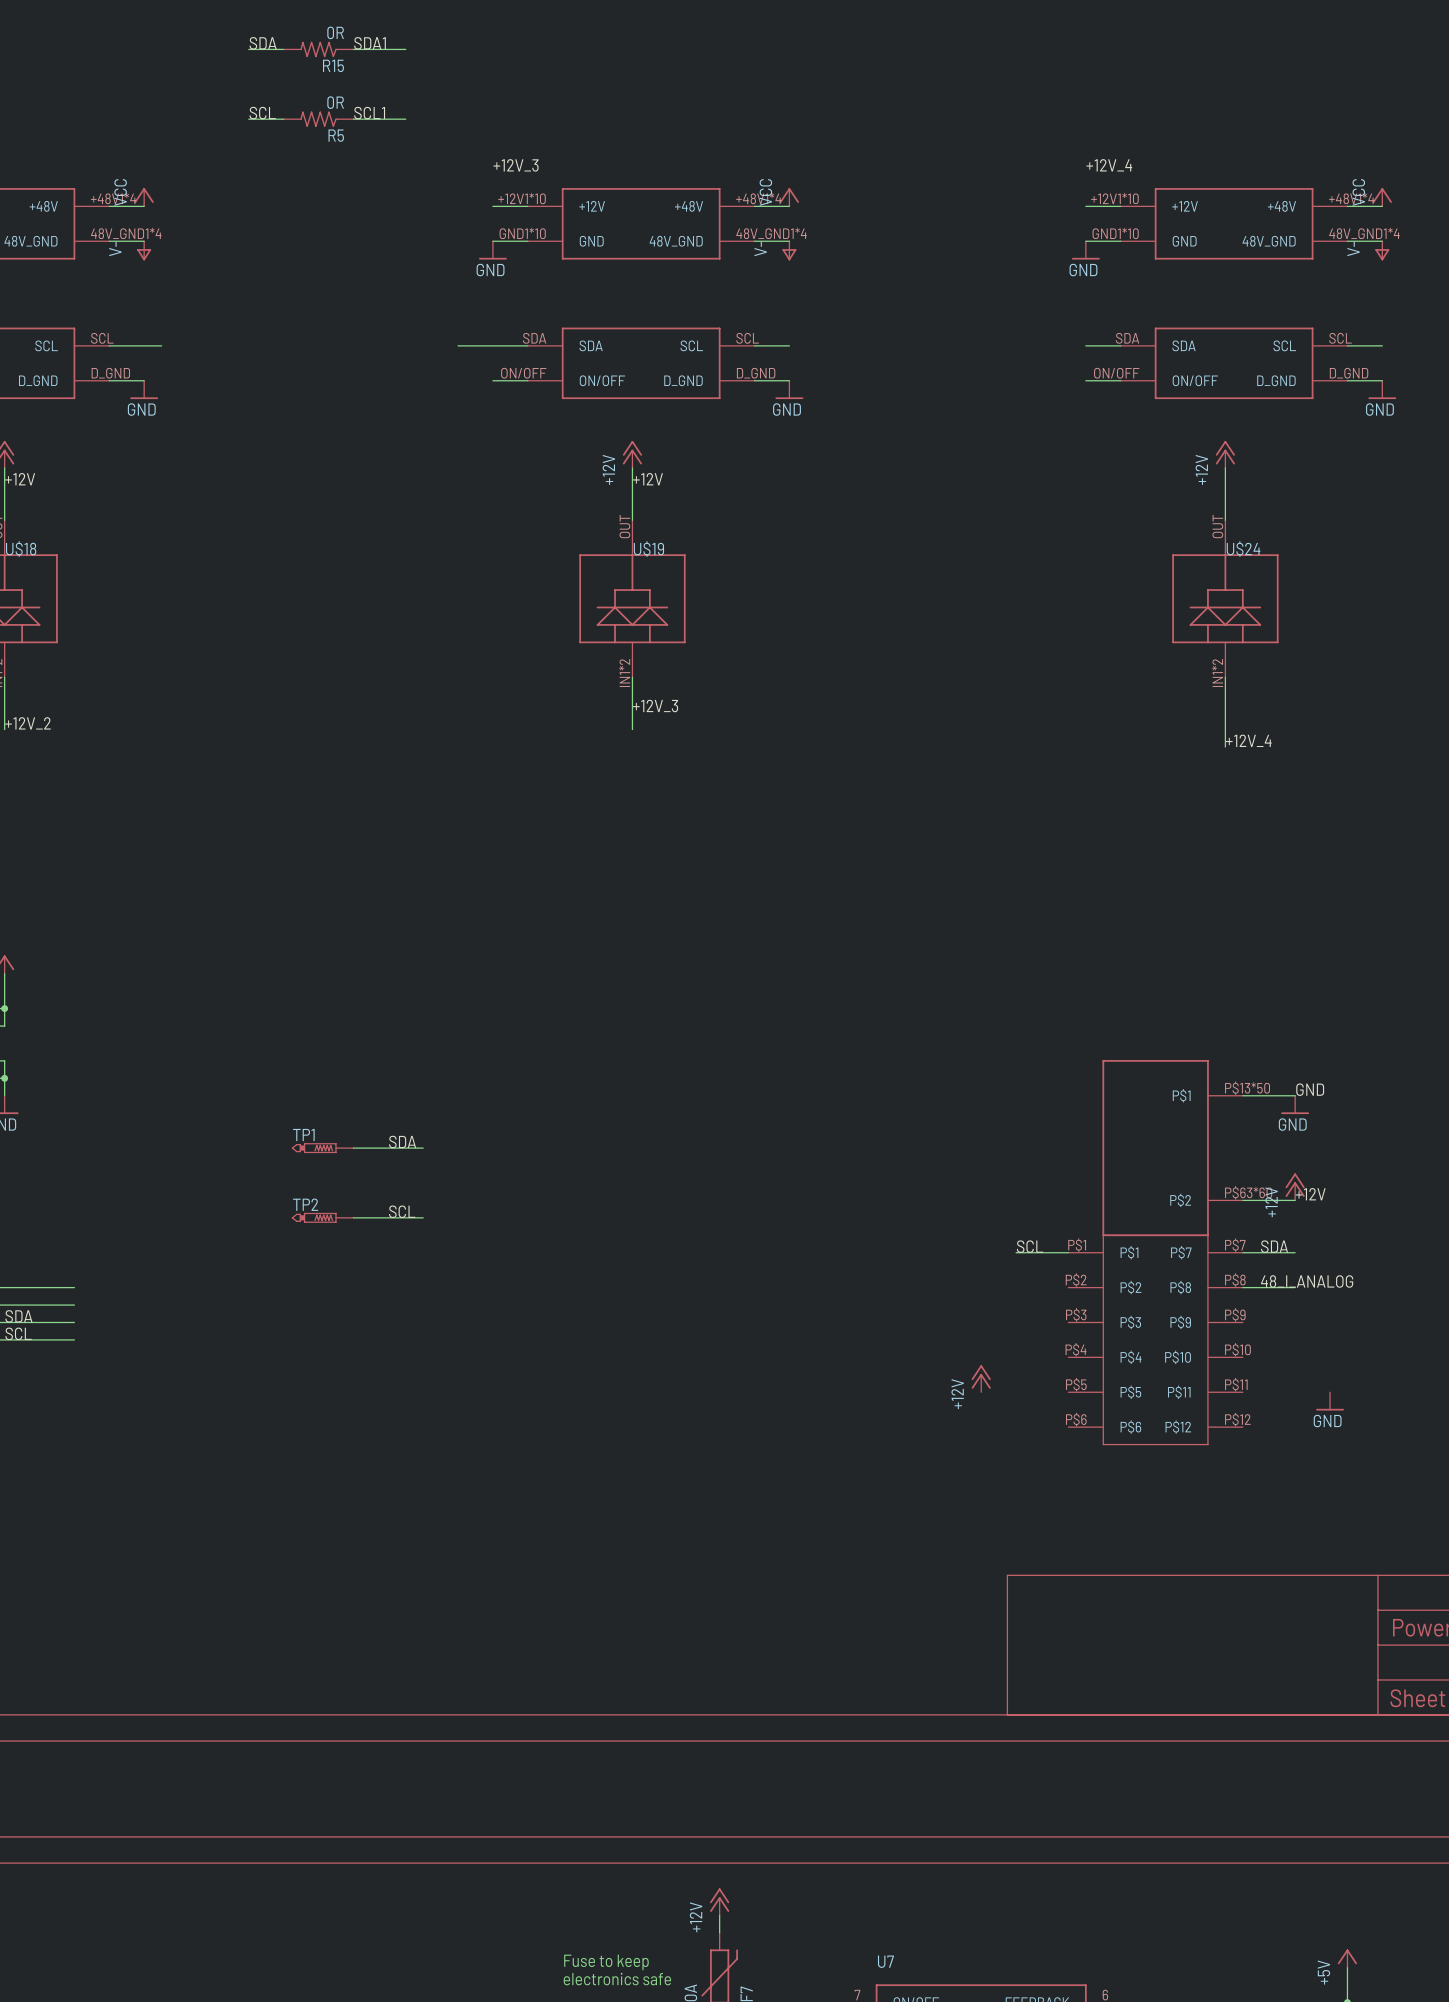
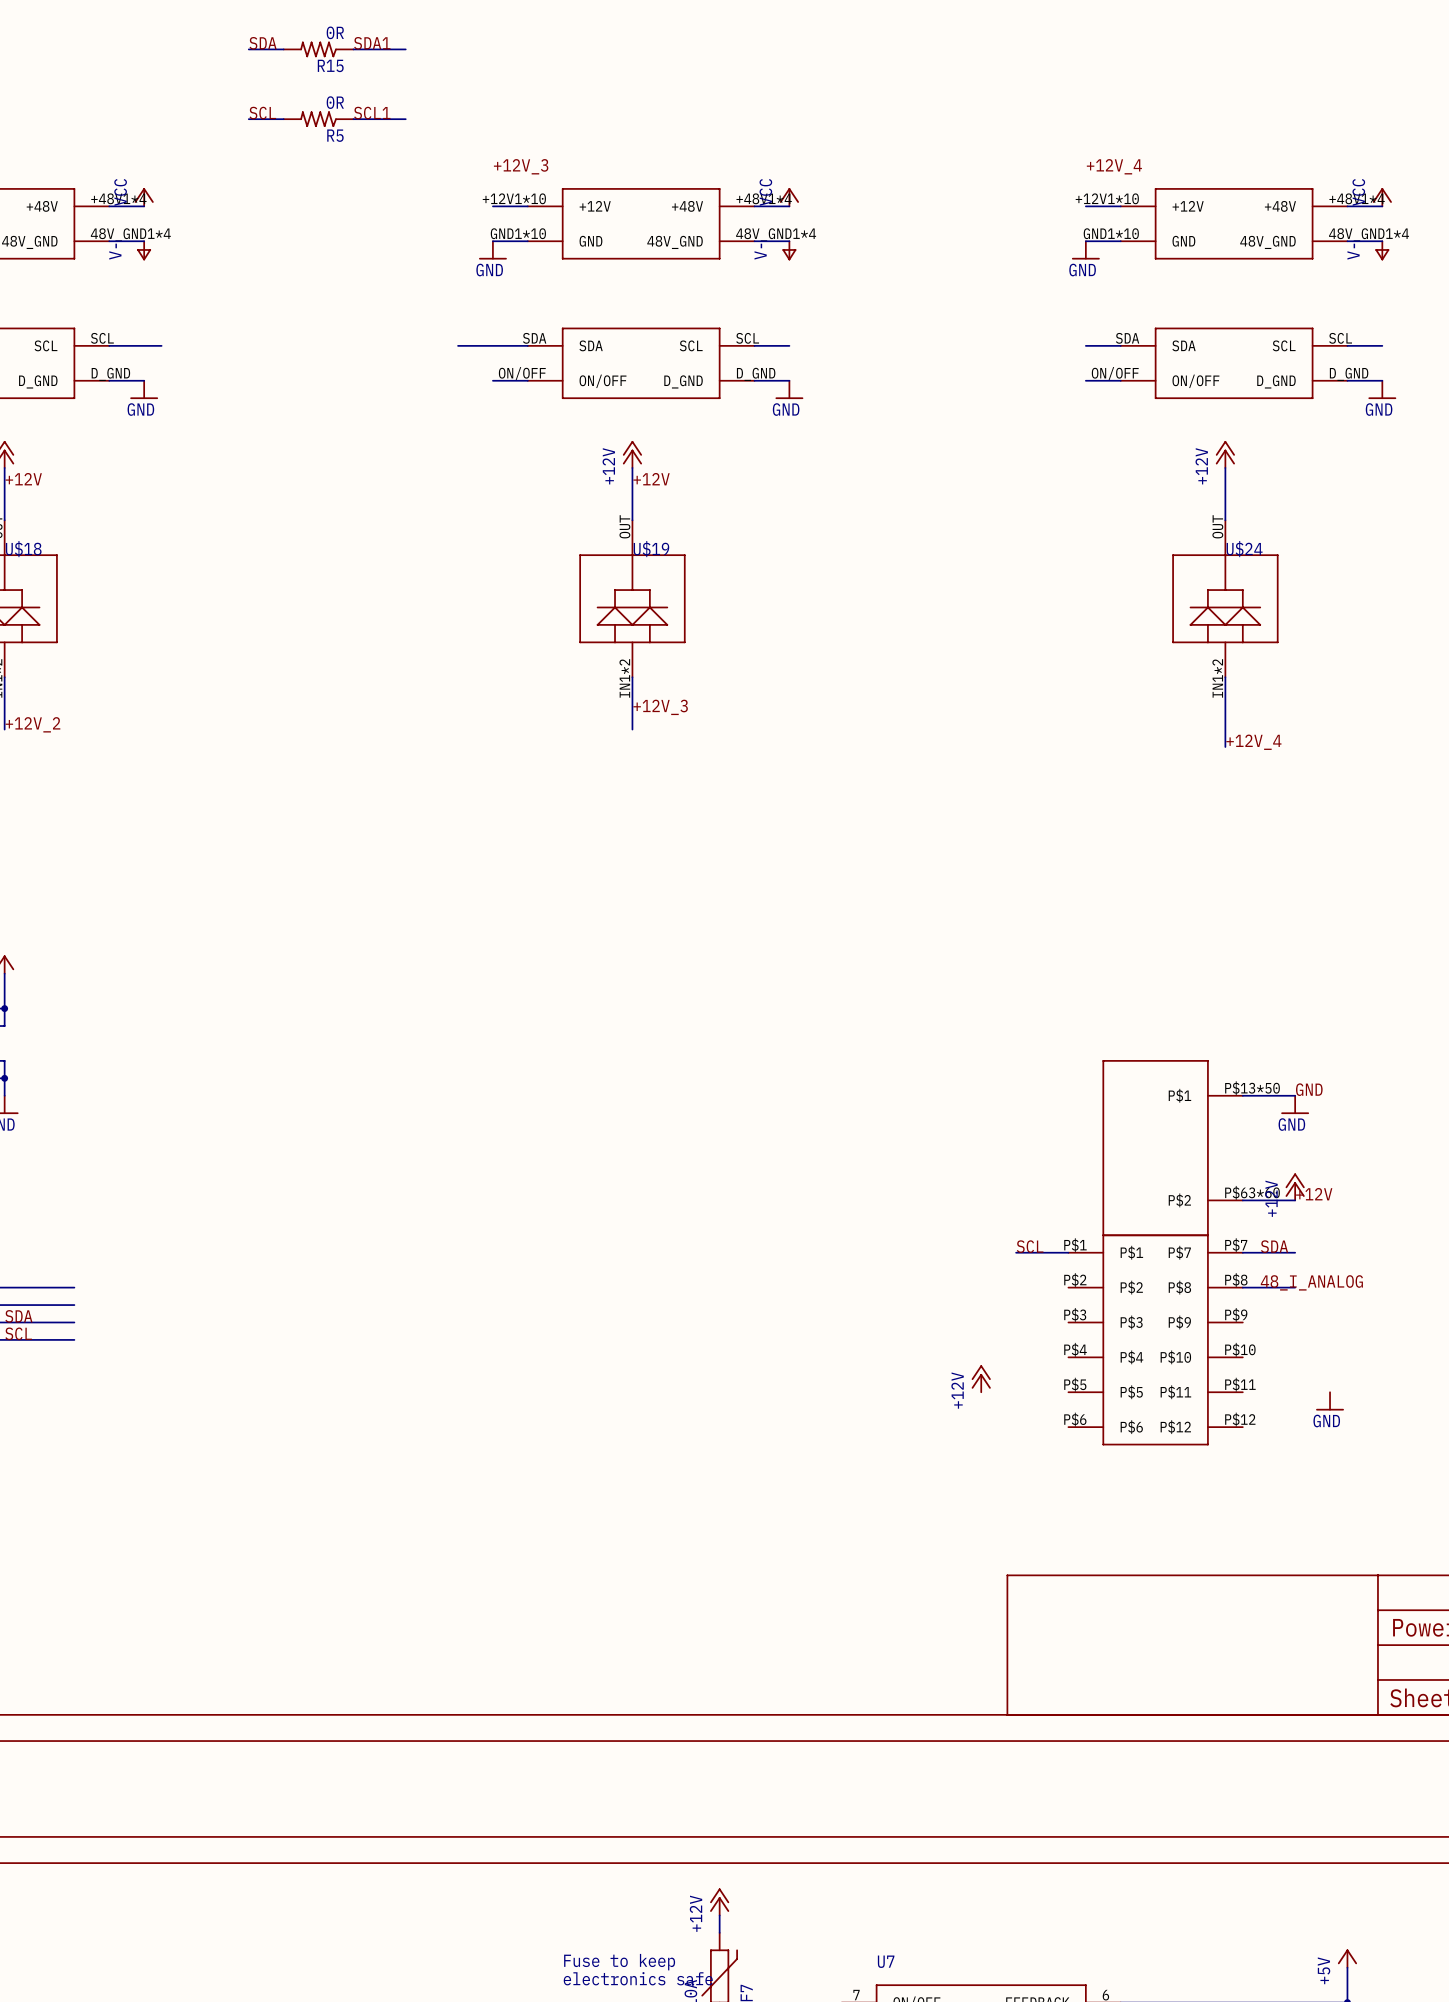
label: SDA (402, 1141) -> none
TP1: (322, 1148) -> none
wire: (353, 1148) (423, 1148) -> none
label: SCL (402, 1211) -> none
TP2: (322, 1217) -> none
wire: (353, 1217) (423, 1217) -> none

